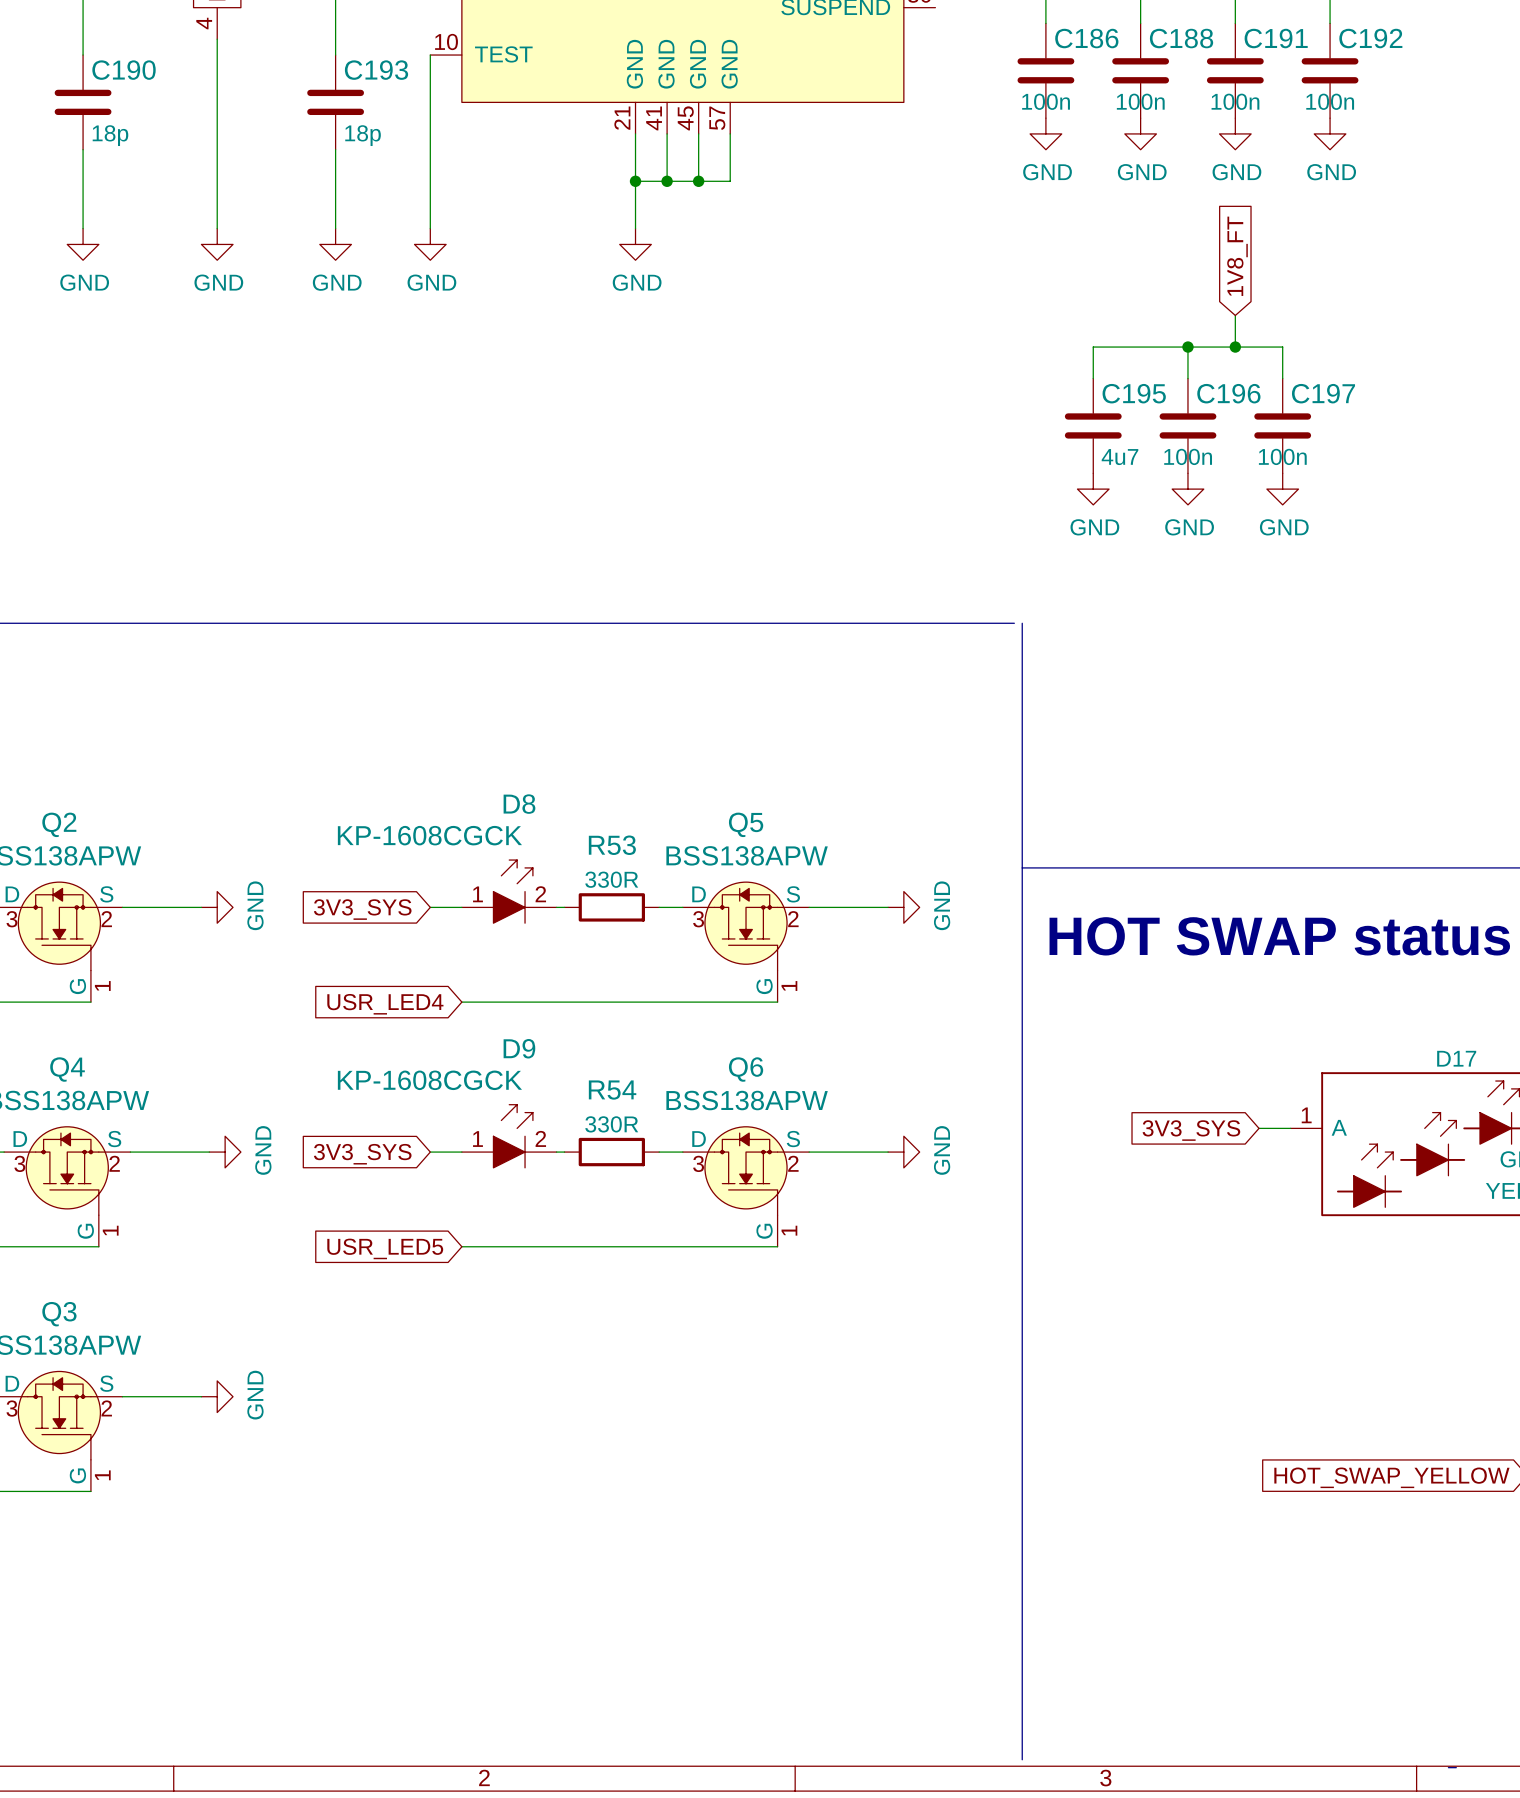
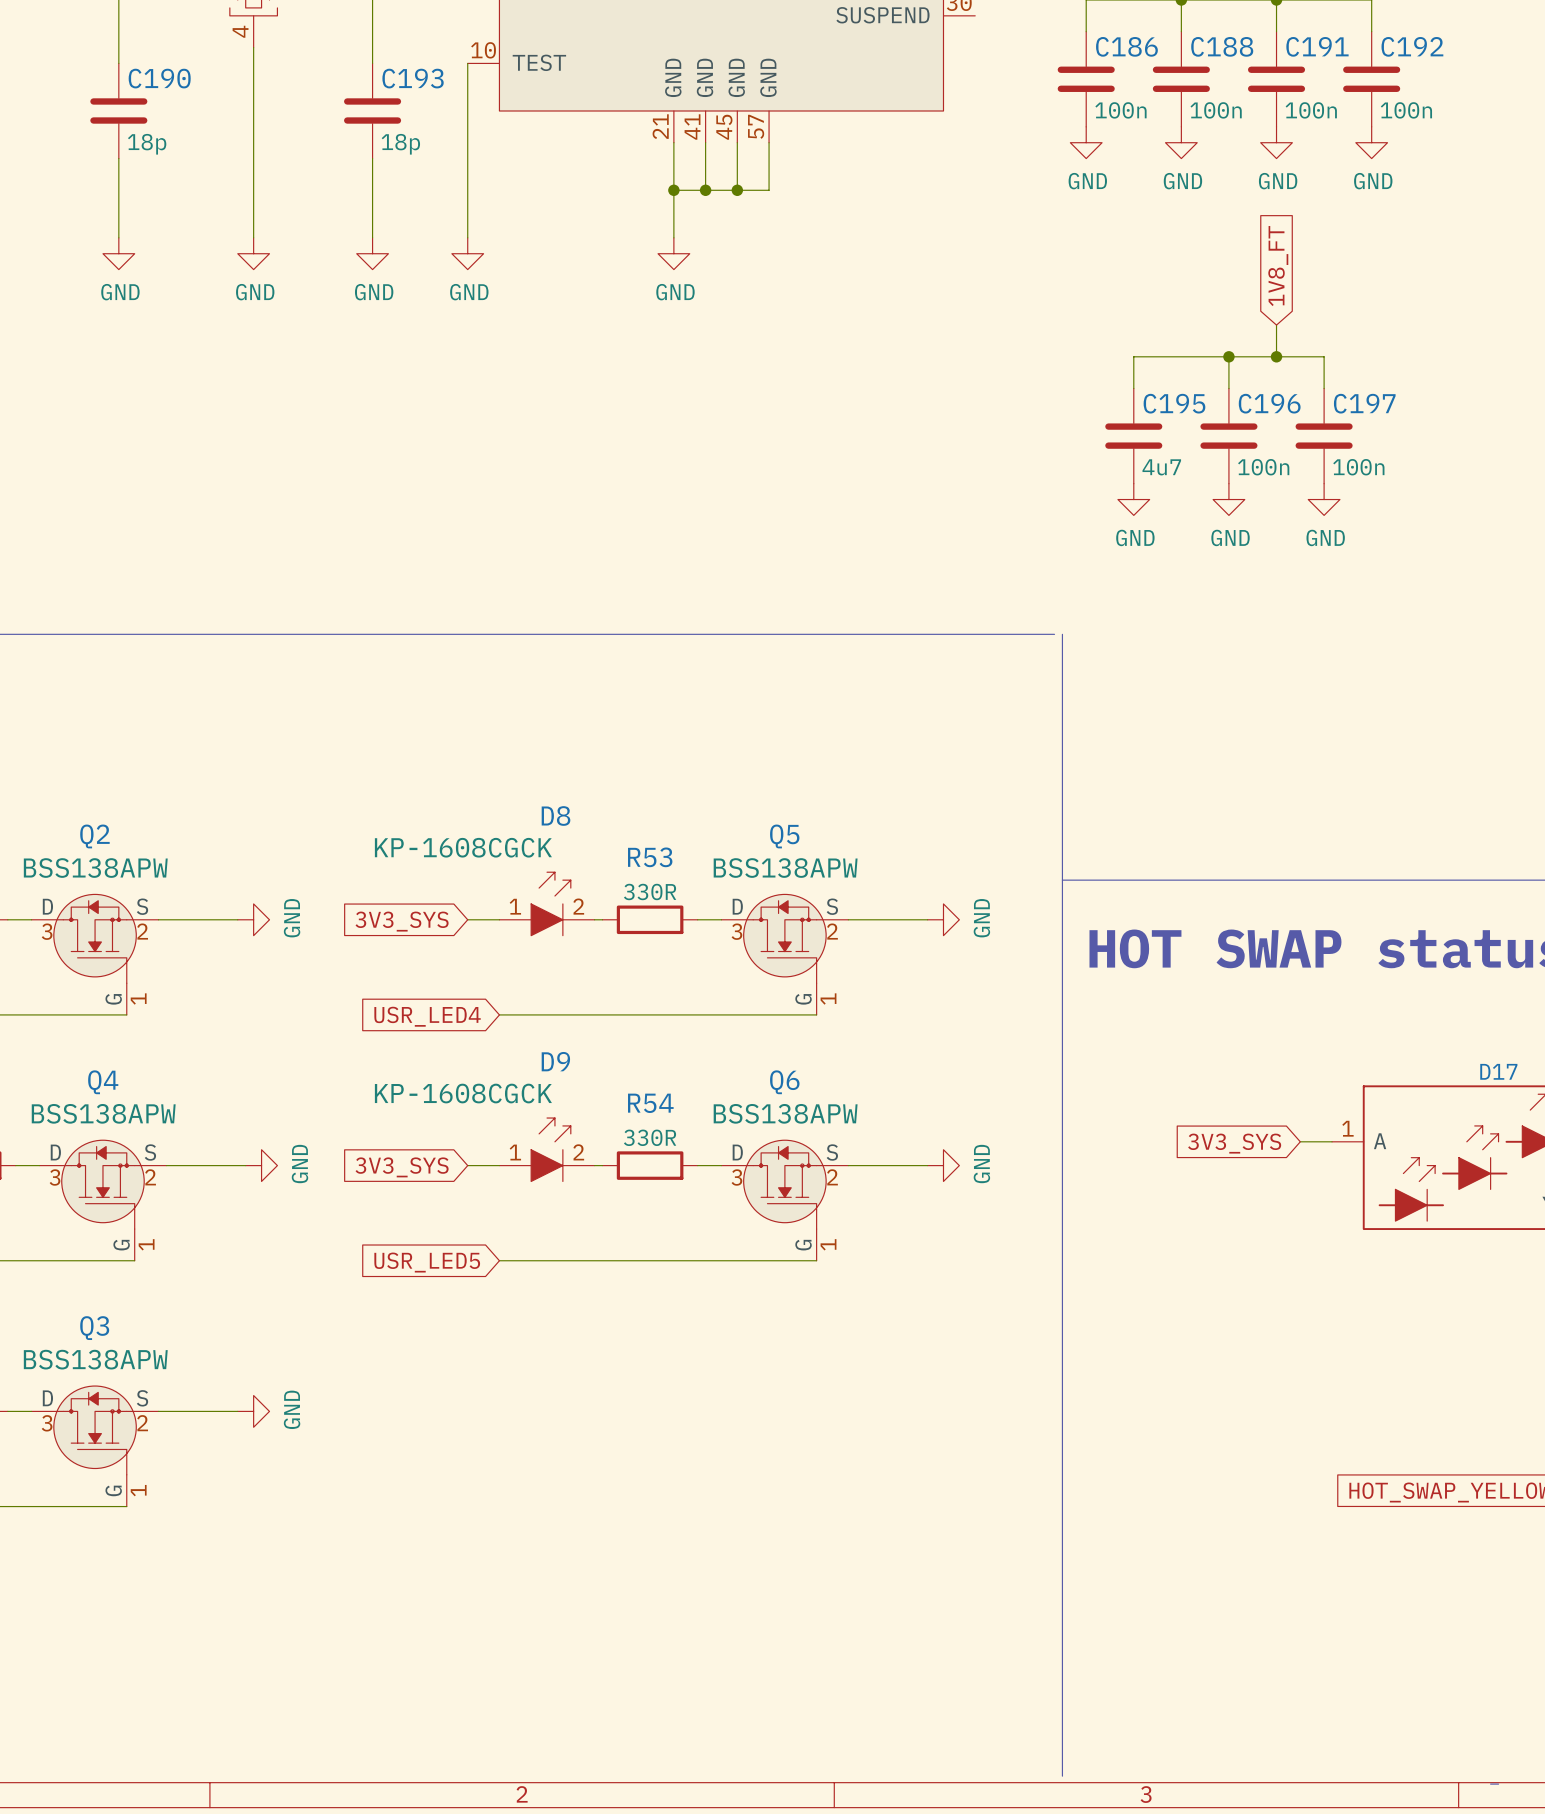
C186 text position: 100n (1046, 101) -> 100n (1120, 110)
C188 text position: 100n (1140, 101) -> 100n (1216, 110)
C191 text position: 100n (1235, 101) -> 100n (1311, 110)
C192 text position: 100n (1330, 101) -> 100n (1406, 110)
C196 text position: 100n (1188, 456) -> 100n (1263, 467)
C197 text position: 100n (1282, 456) -> 100n (1358, 467)

